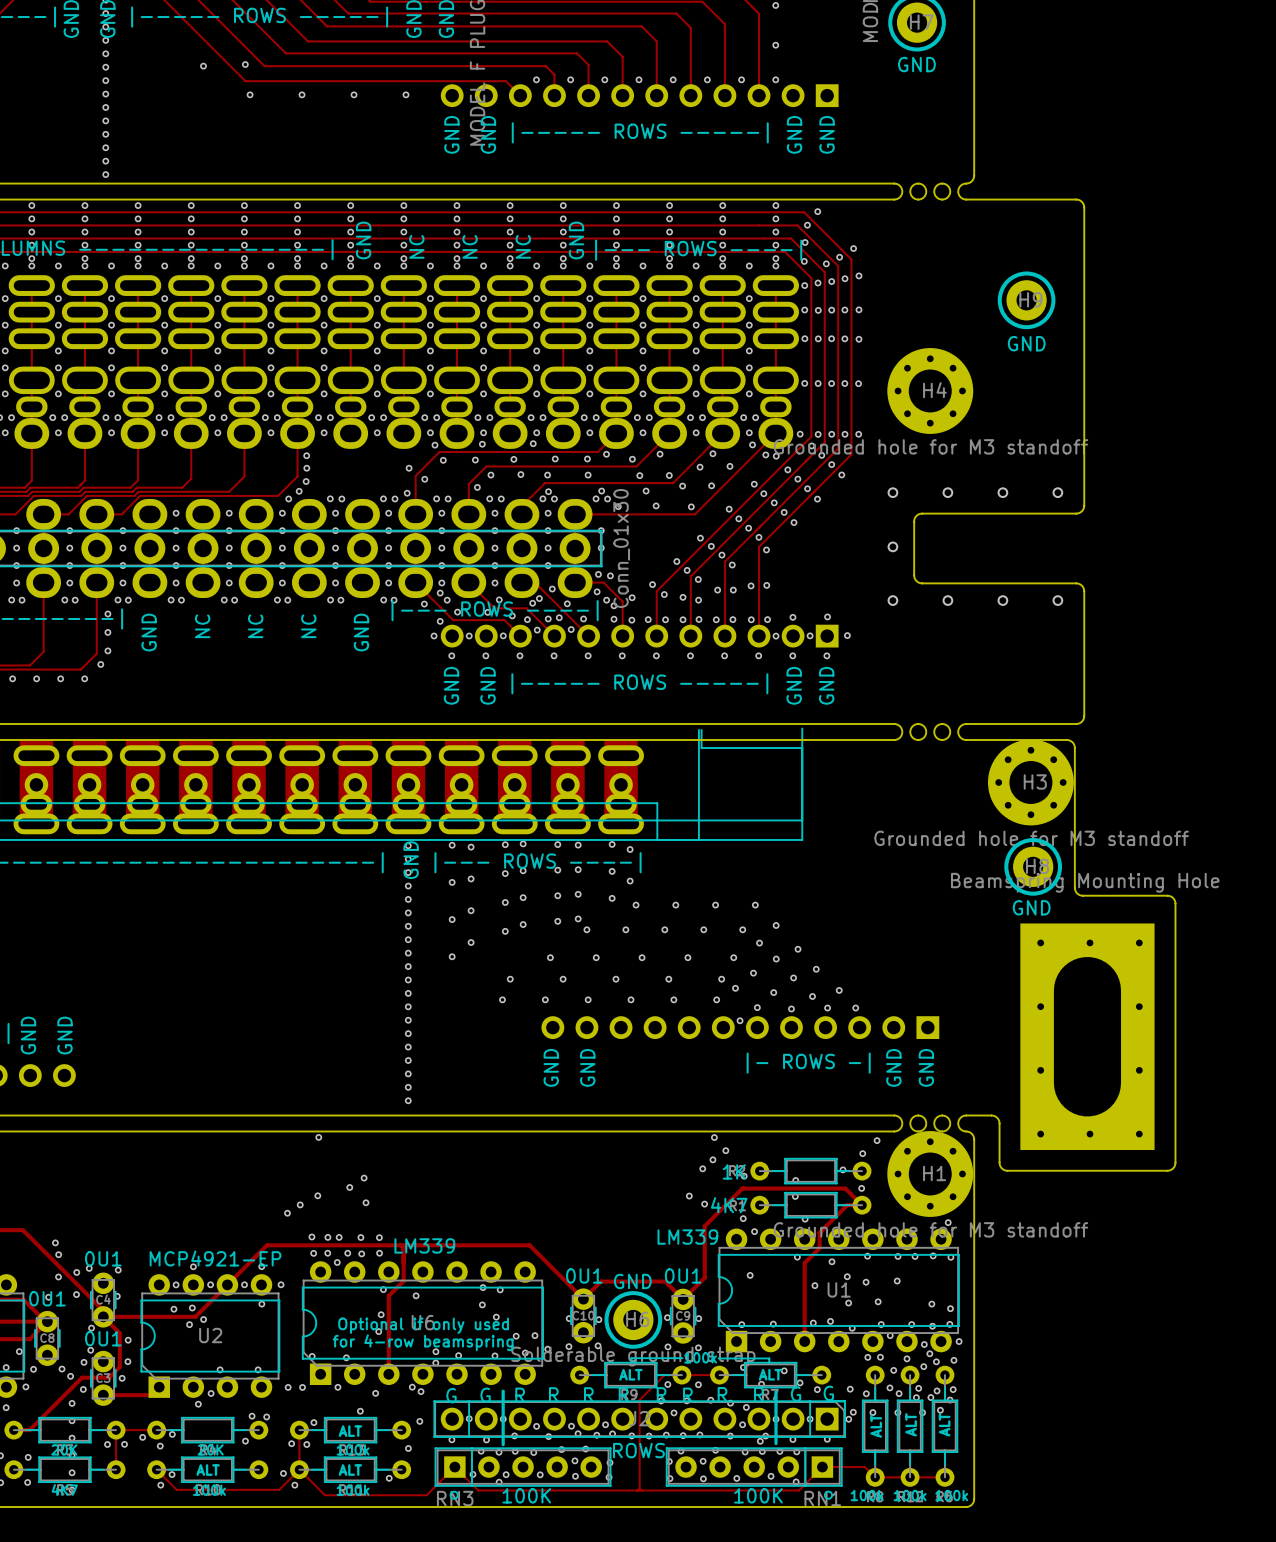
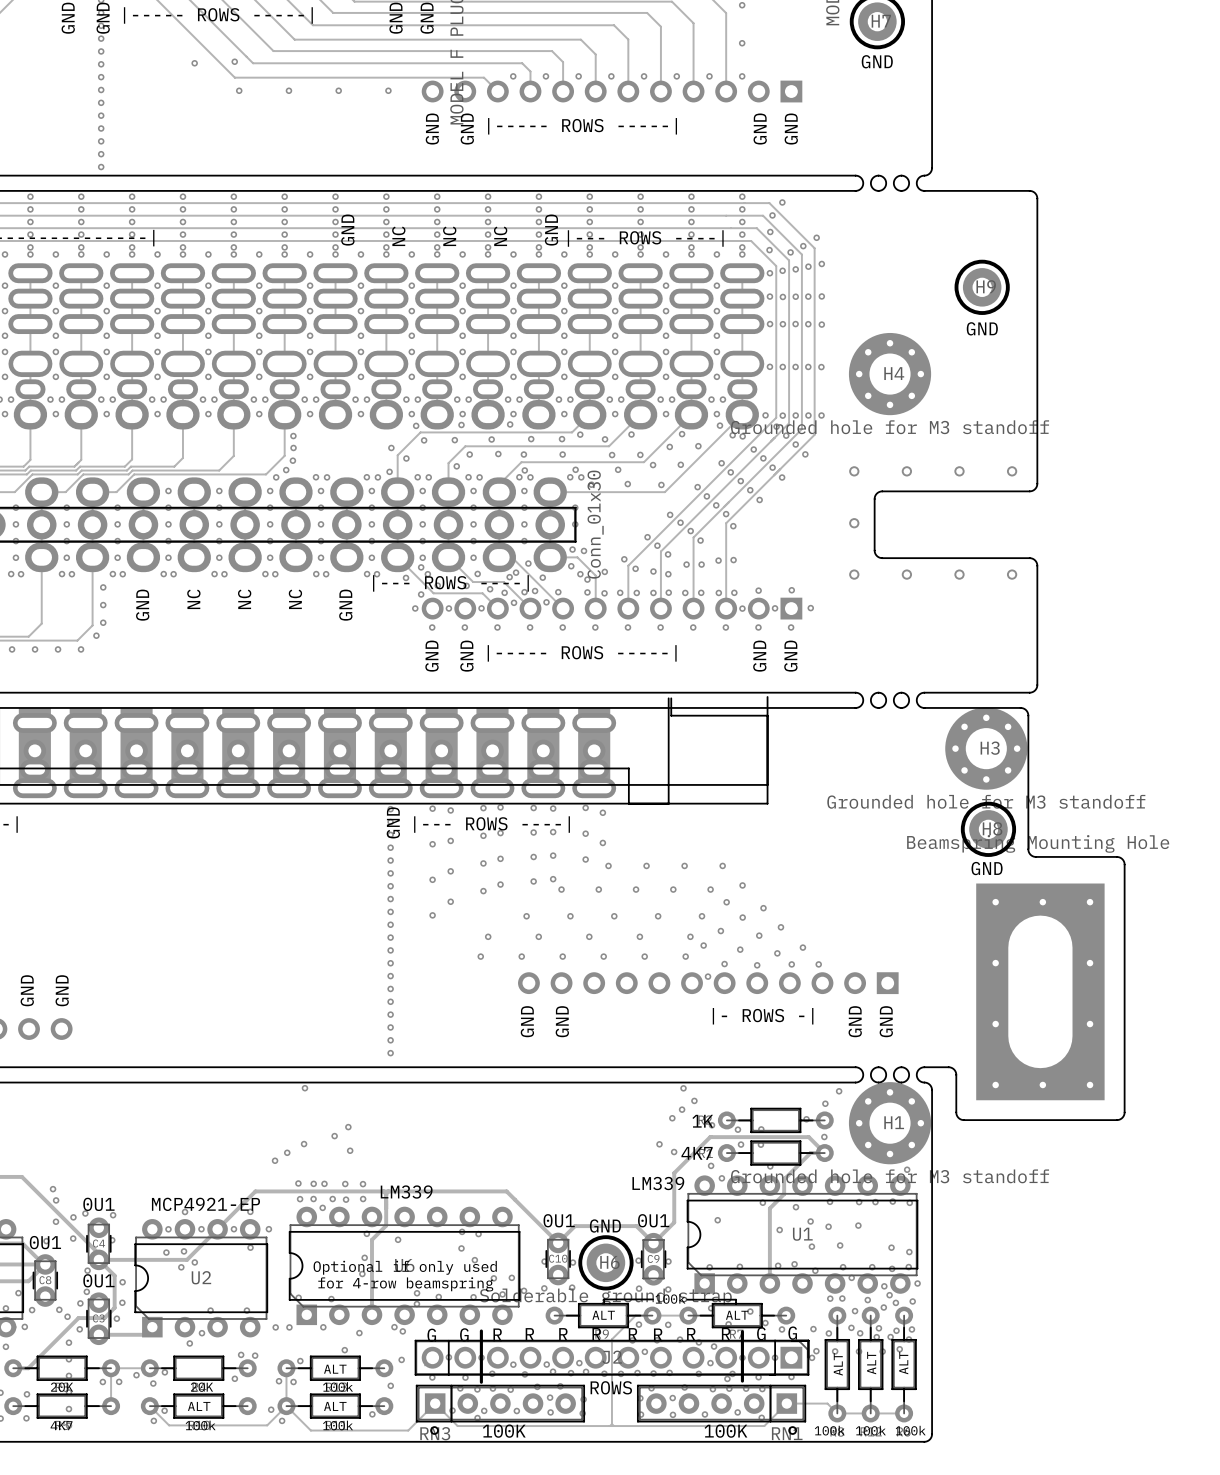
via: none -> (737, 1129)
via: none -> (741, 1144)

